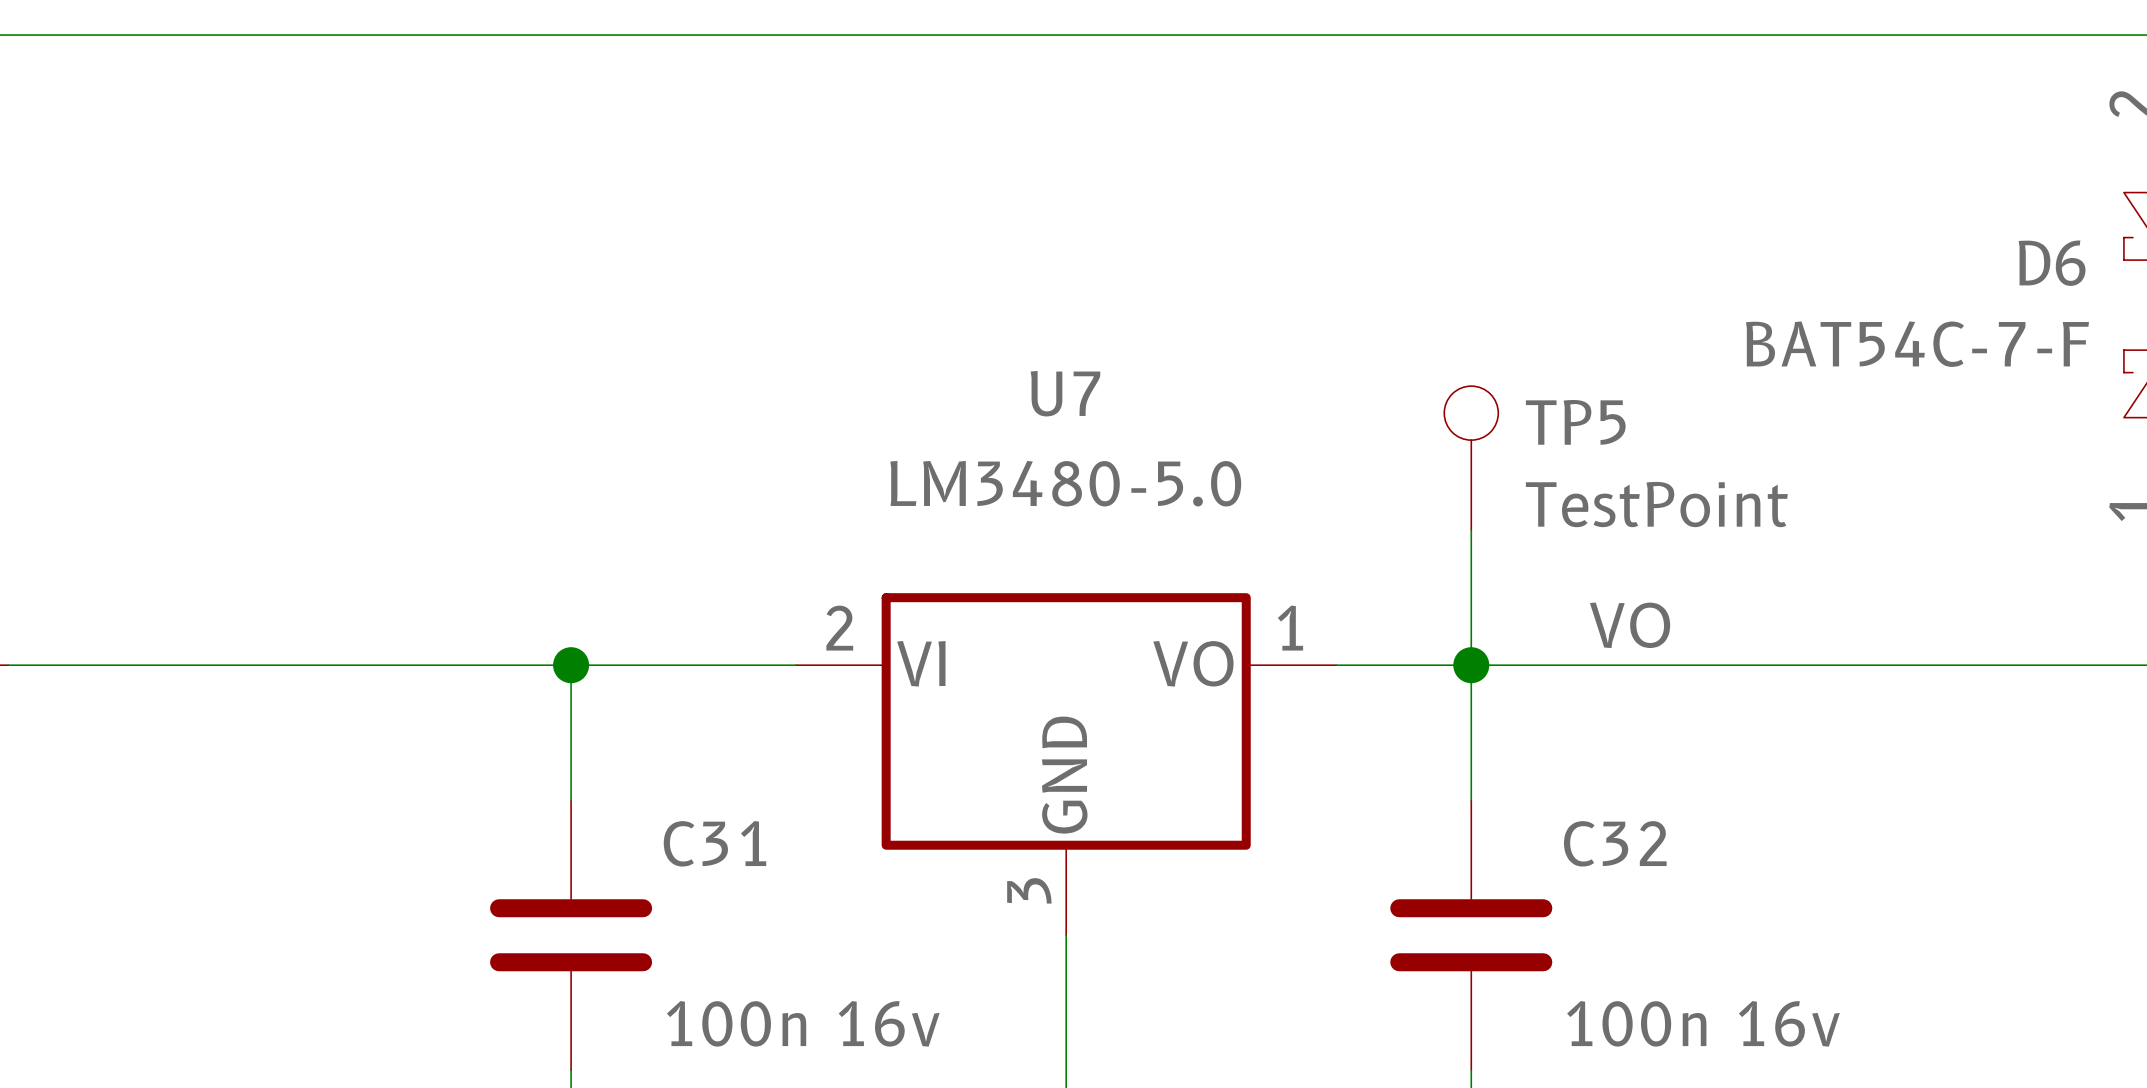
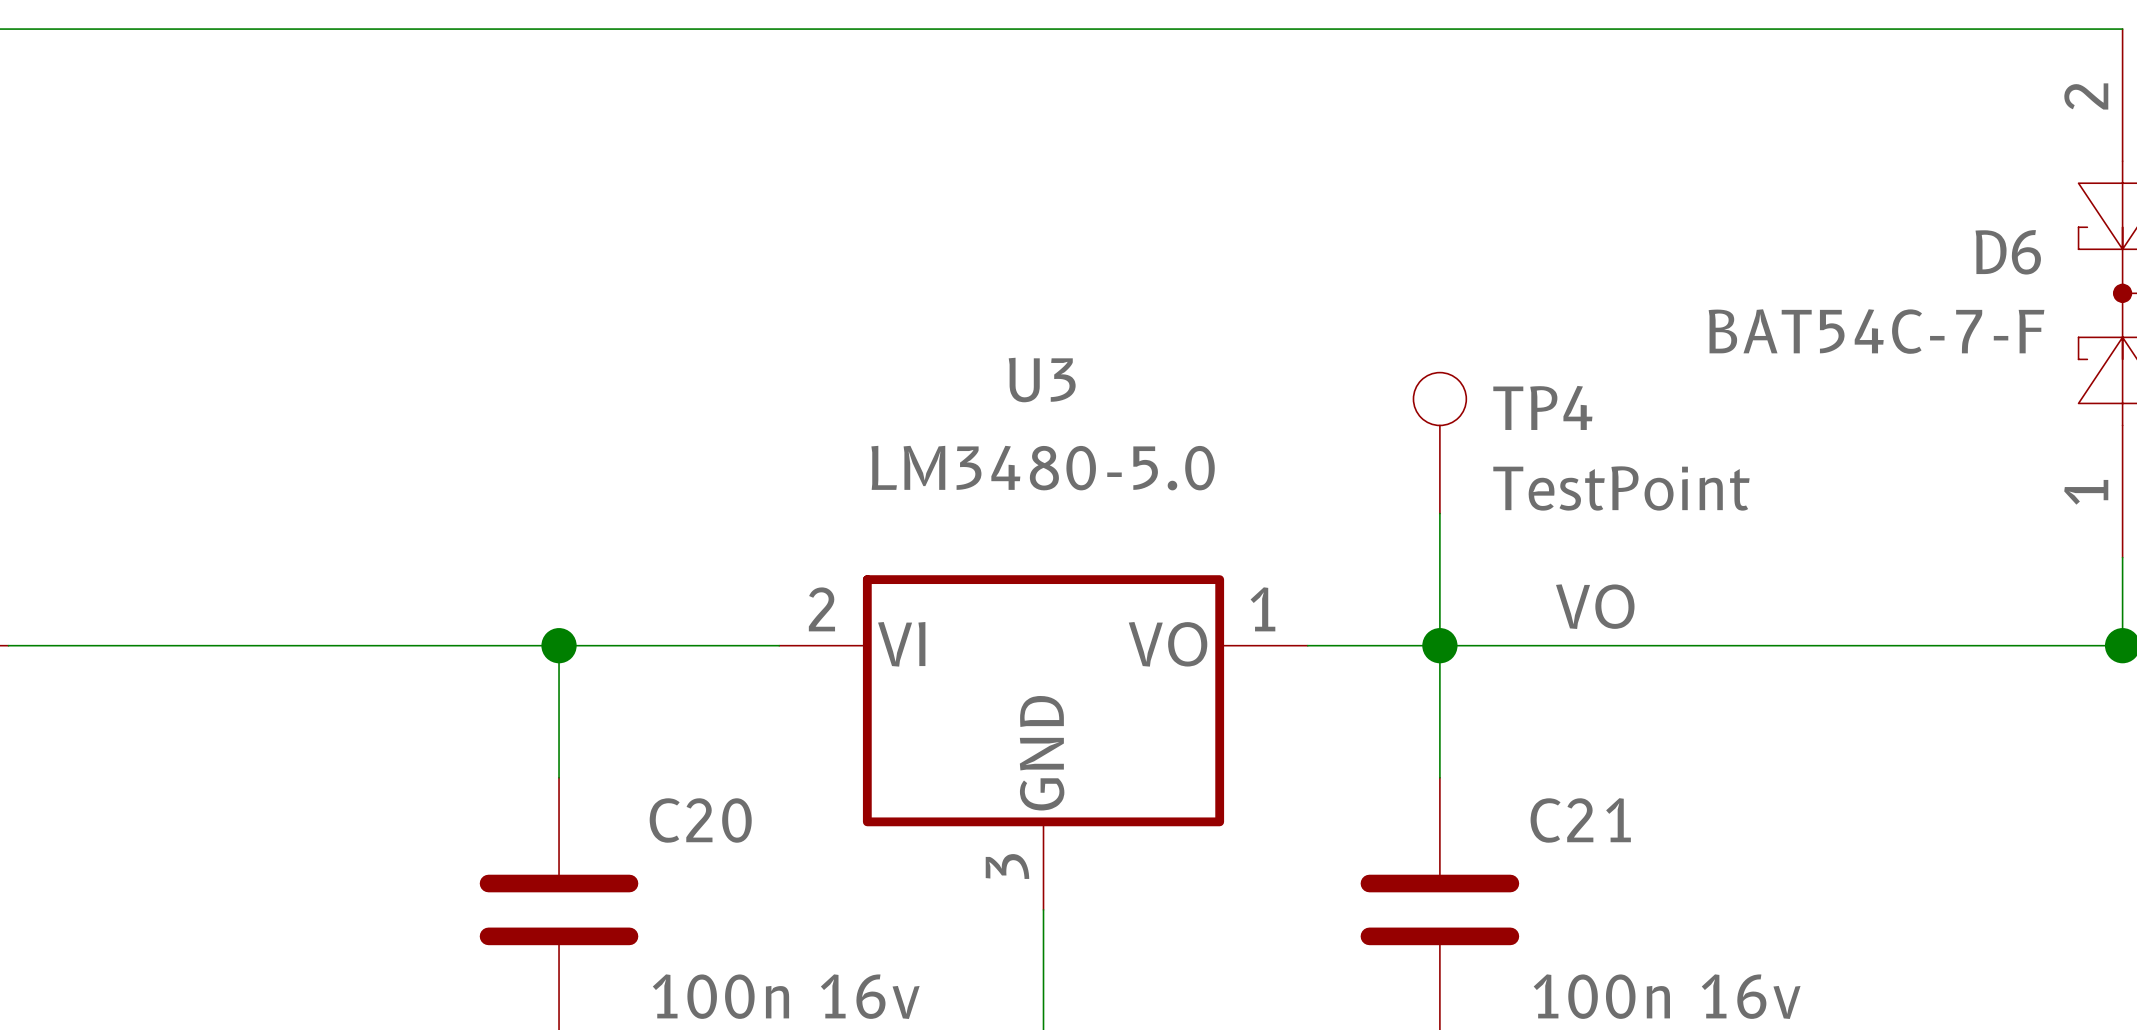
U7 name: U7 (1065, 393) -> U3 (1042, 380)
TP5 name: TP5 (1575, 422) -> TP4 (1542, 407)
C31 name: C31 (714, 843) -> C20 (700, 820)
C32 name: C32 (1615, 843) -> C21 (1580, 820)

